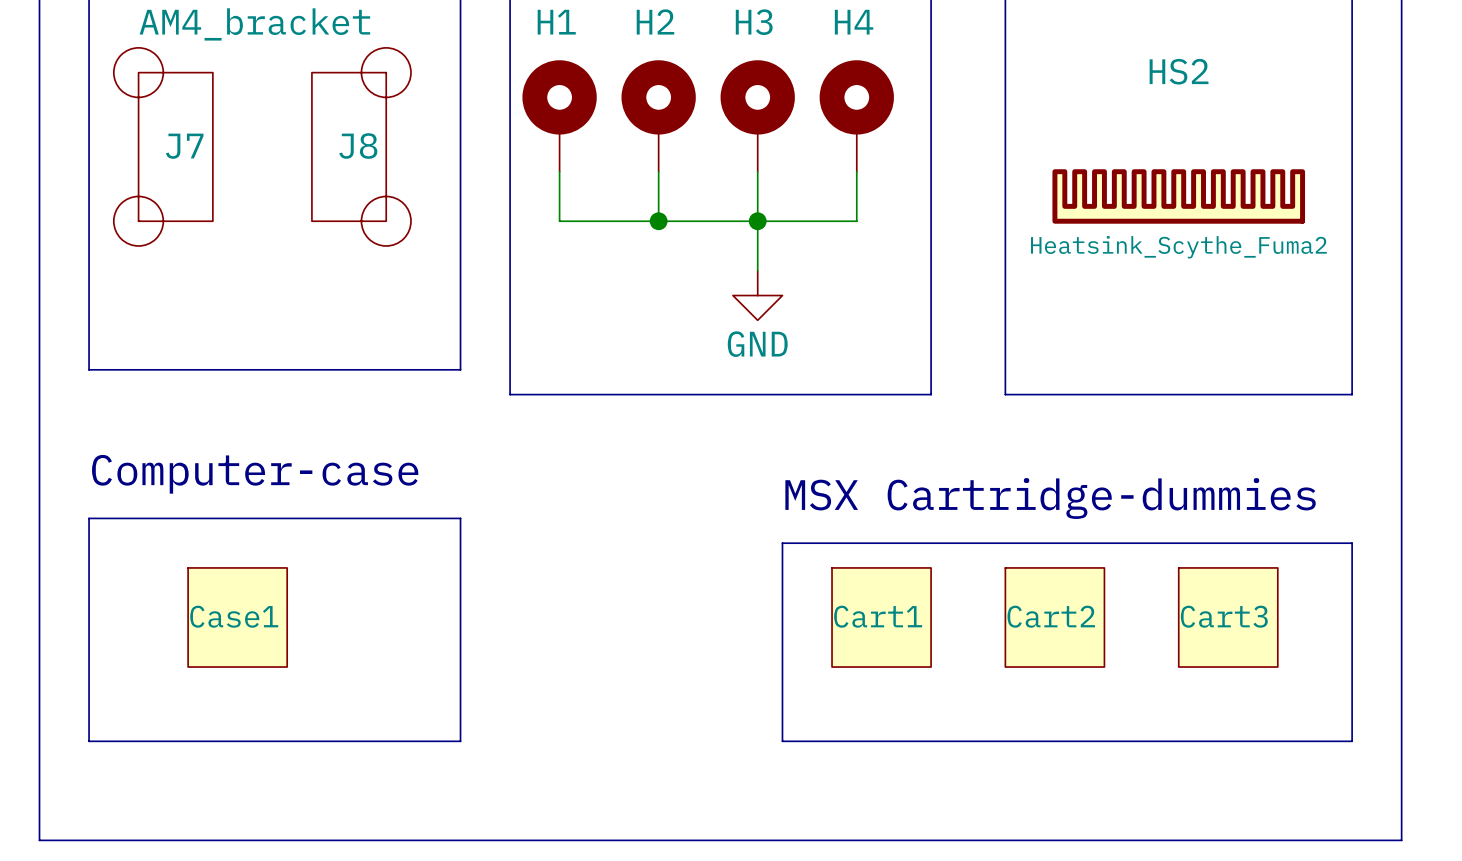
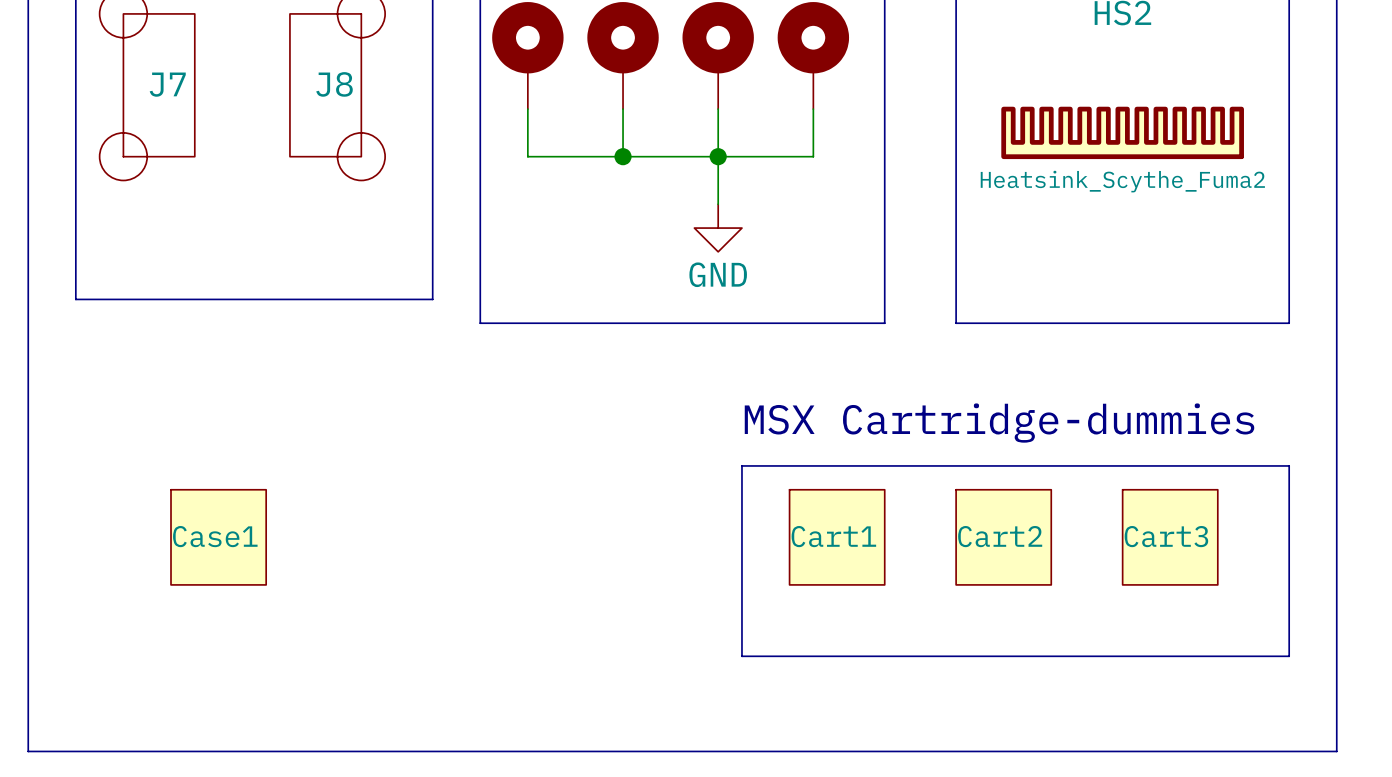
text: Computer-case (255, 474) -> none
line: (89, 518) (460, 518) (460, 741) (89, 741) (89, 518) -> none

